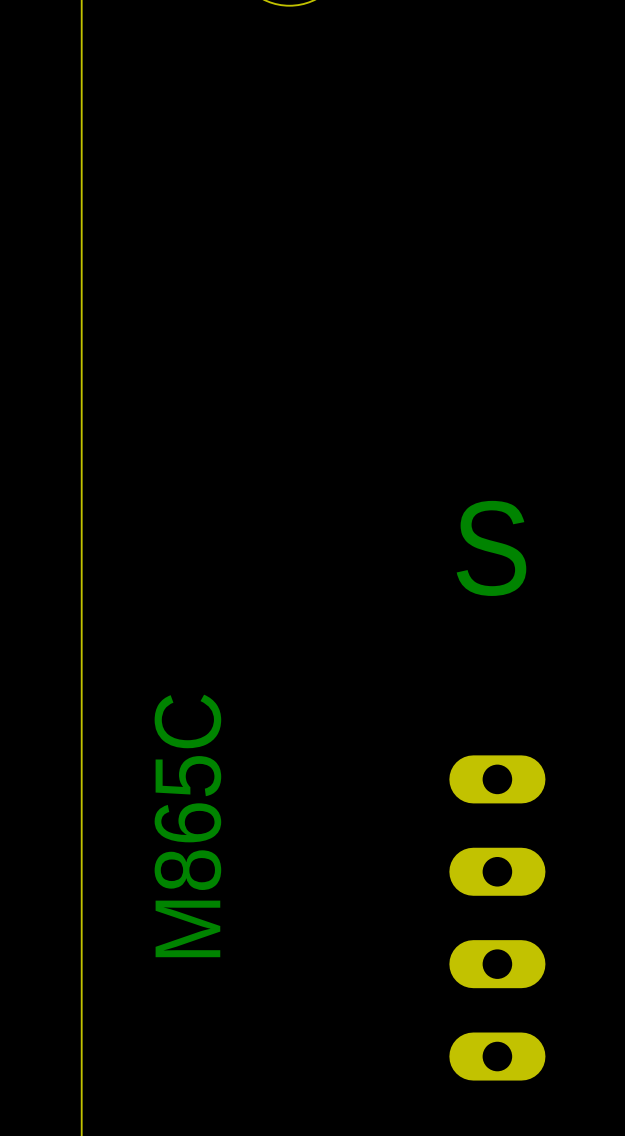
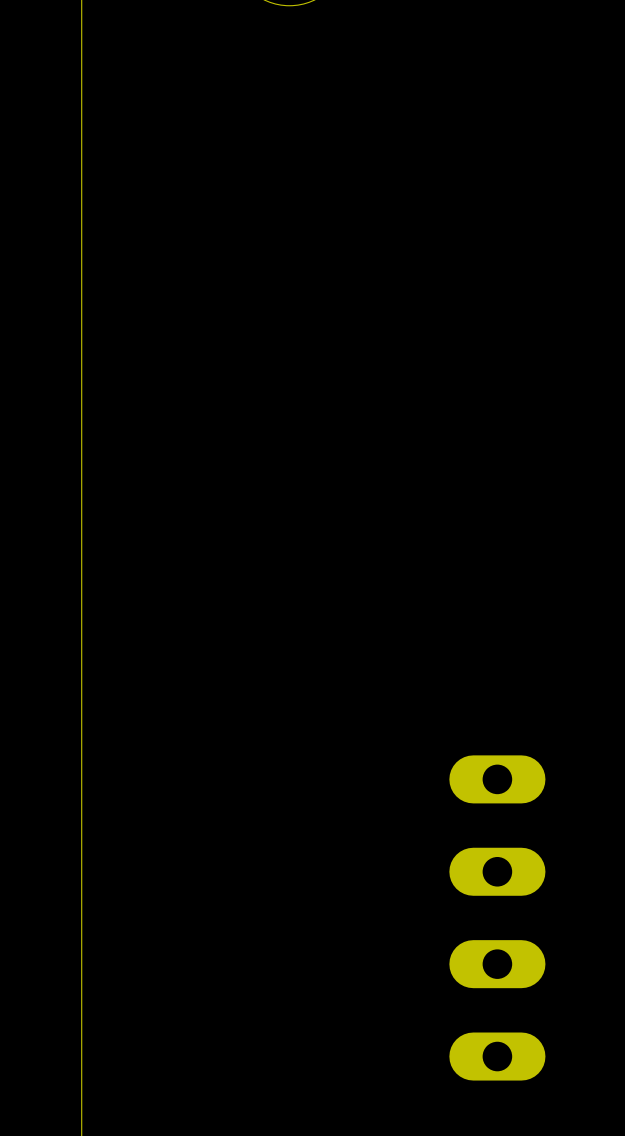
text: S (491, 548) -> none
text: M865C (187, 825) -> none

